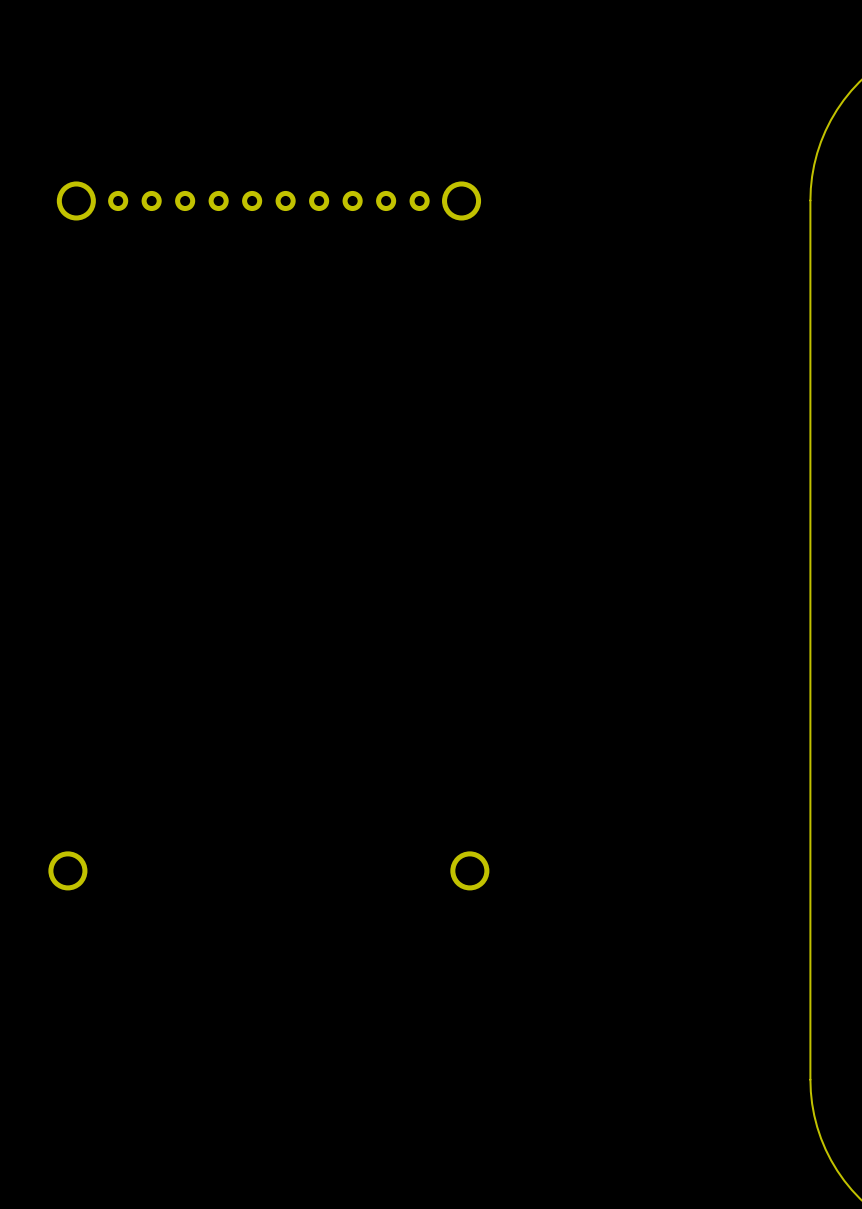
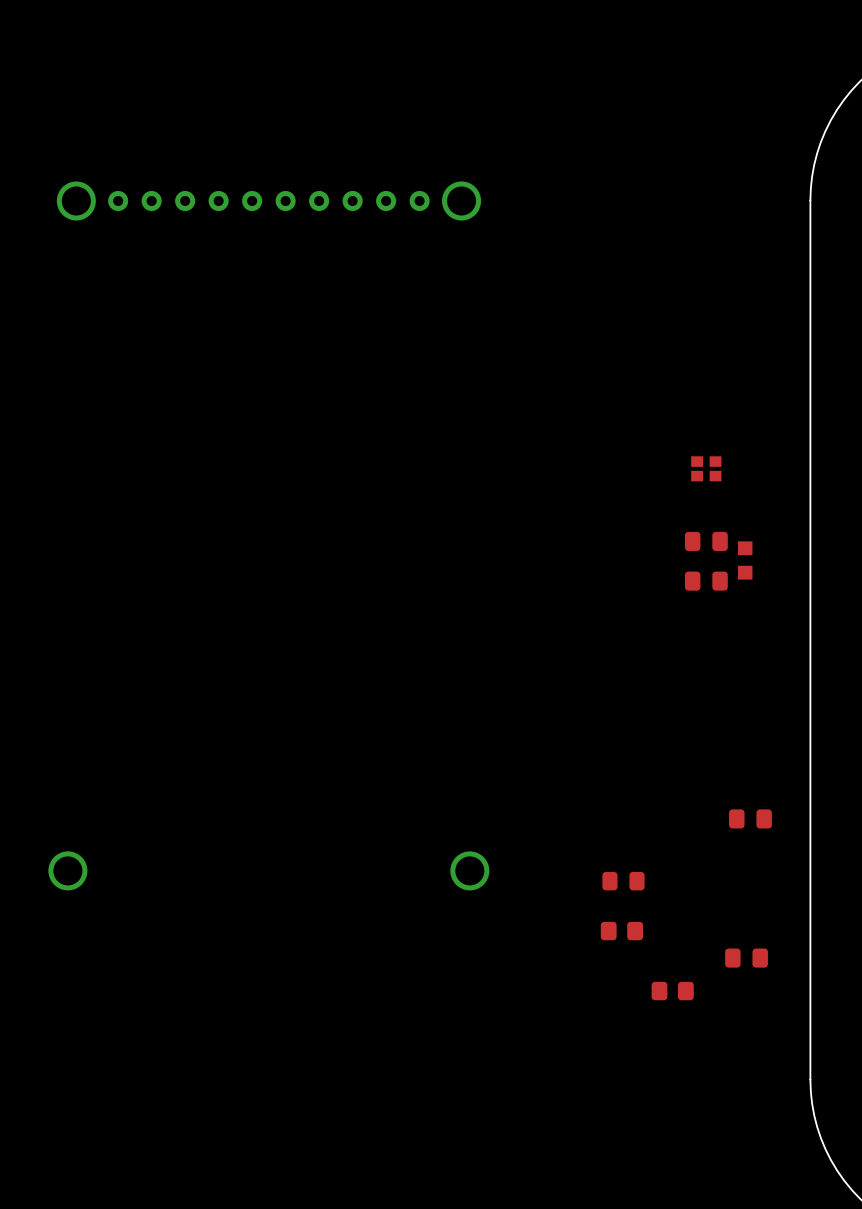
part: none -> (706, 468)
part: none -> (706, 541)
part: none -> (745, 560)
part: none -> (706, 581)
part: none -> (750, 818)
part: none -> (623, 881)
part: none -> (621, 931)
part: none -> (746, 958)
part: none -> (672, 991)

